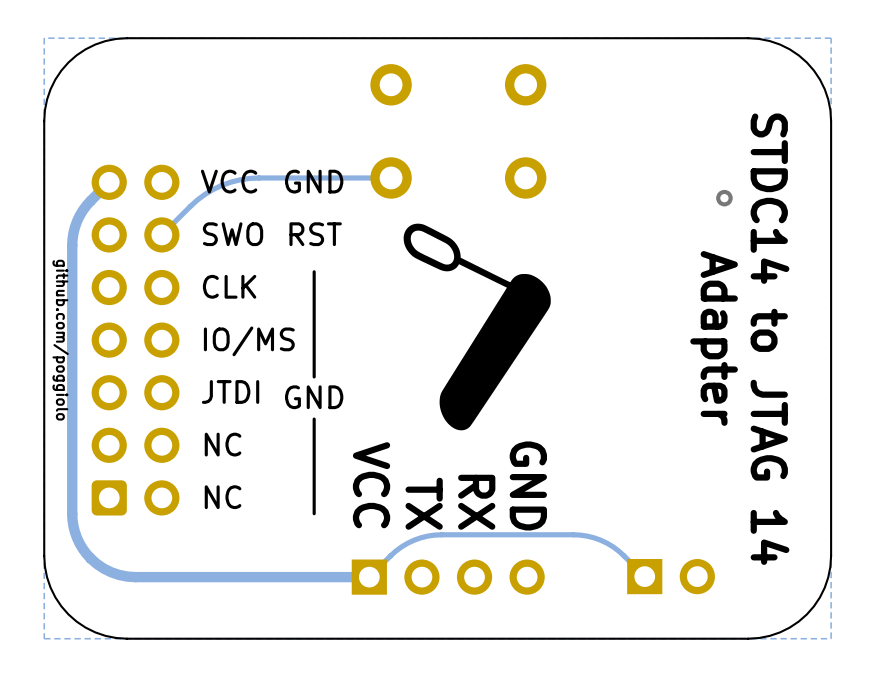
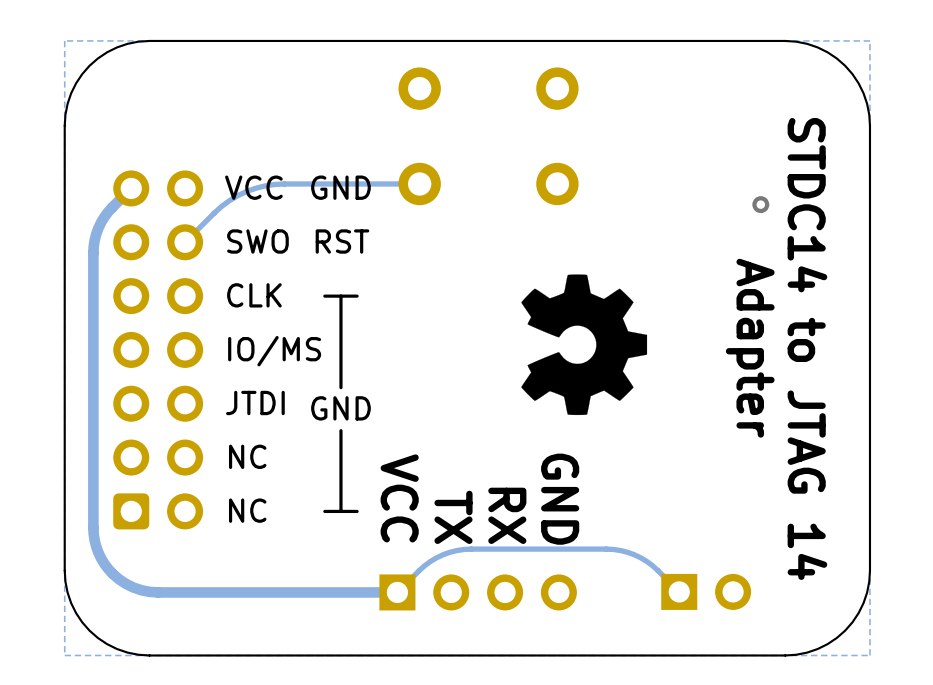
drawing: [403, 223, 551, 431] -> none
drawing: none -> [521, 274, 648, 416]
line: (314, 271) (314, 287) -> none
line: none -> (357, 296) (324, 296)
text: github.com/poggiolo (60, 340) -> none
line: (314, 497) (314, 513) -> none
line: none -> (357, 511) (324, 511)

